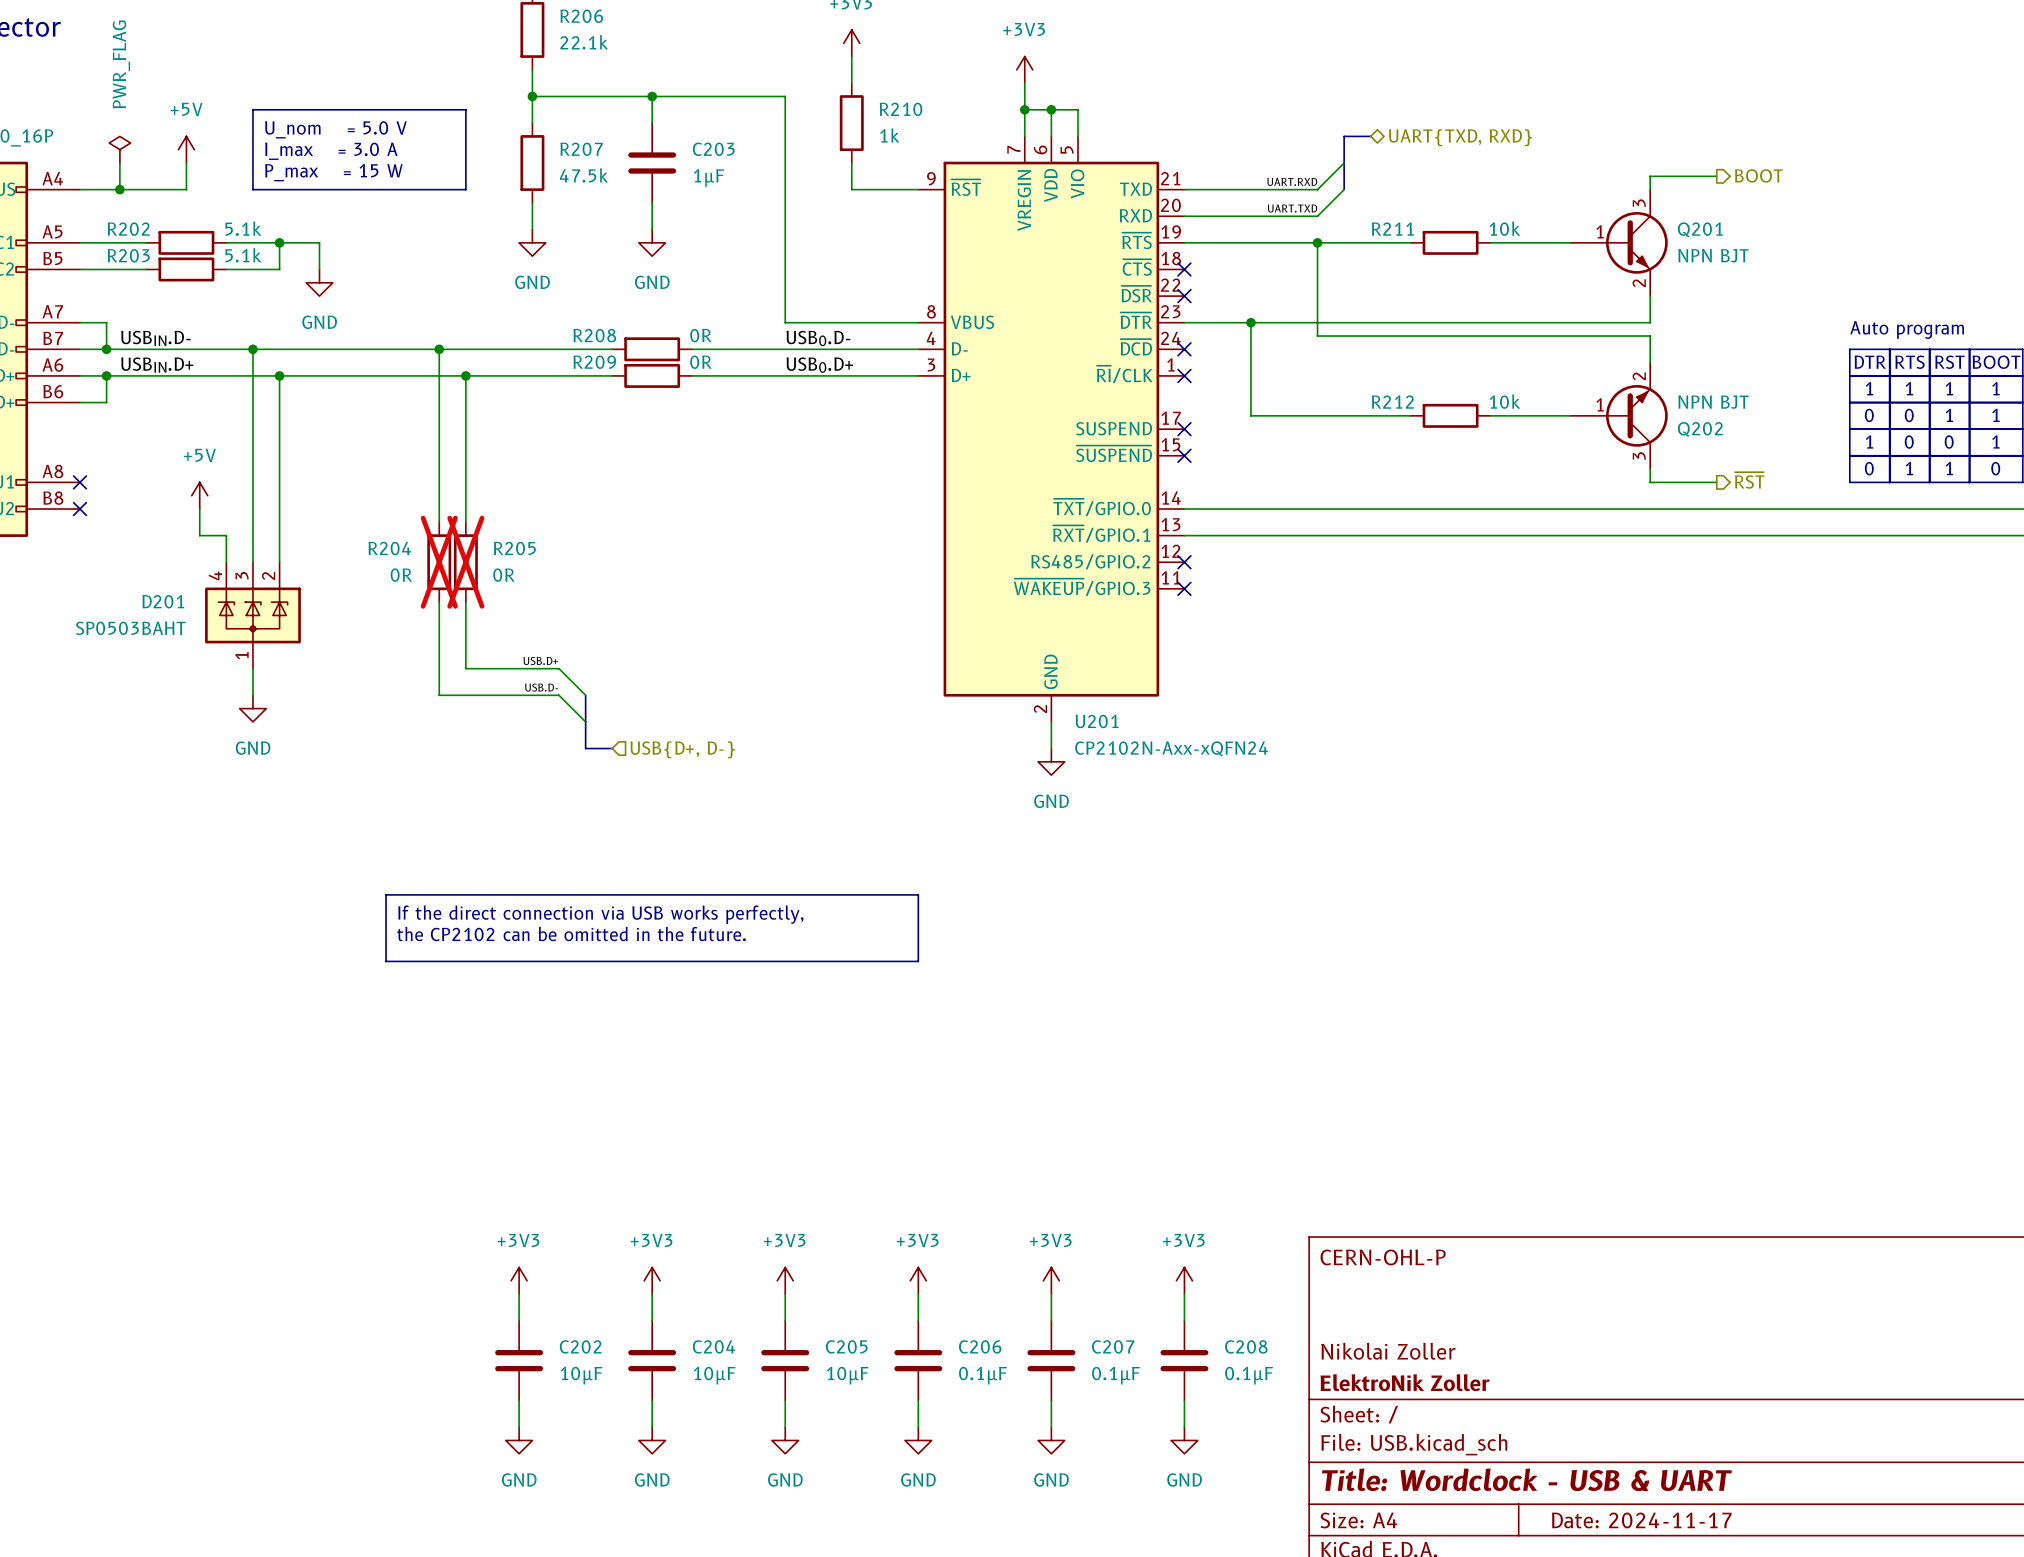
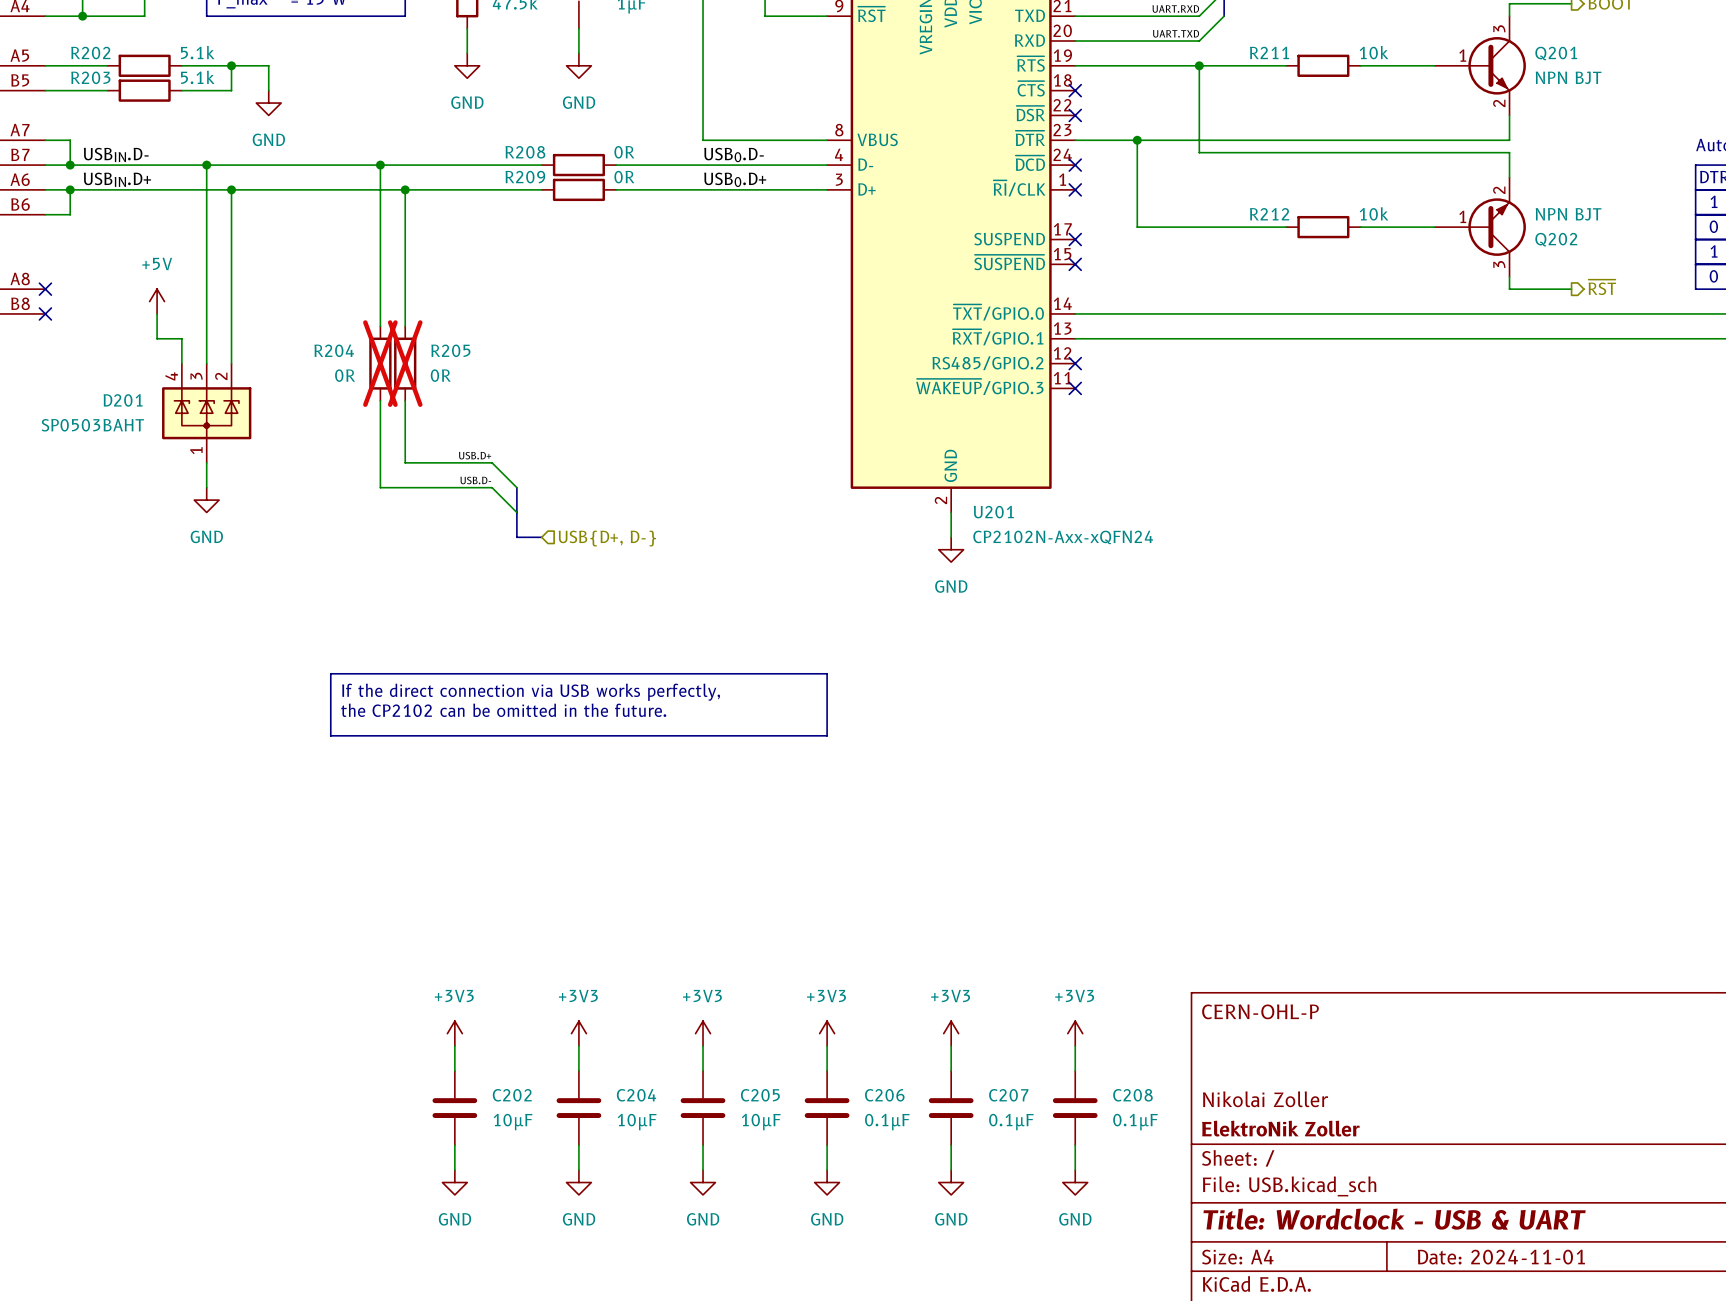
title block: Date: 2024-11-17 (1641, 1520) -> Date: 2024-11-01 (1501, 1257)

